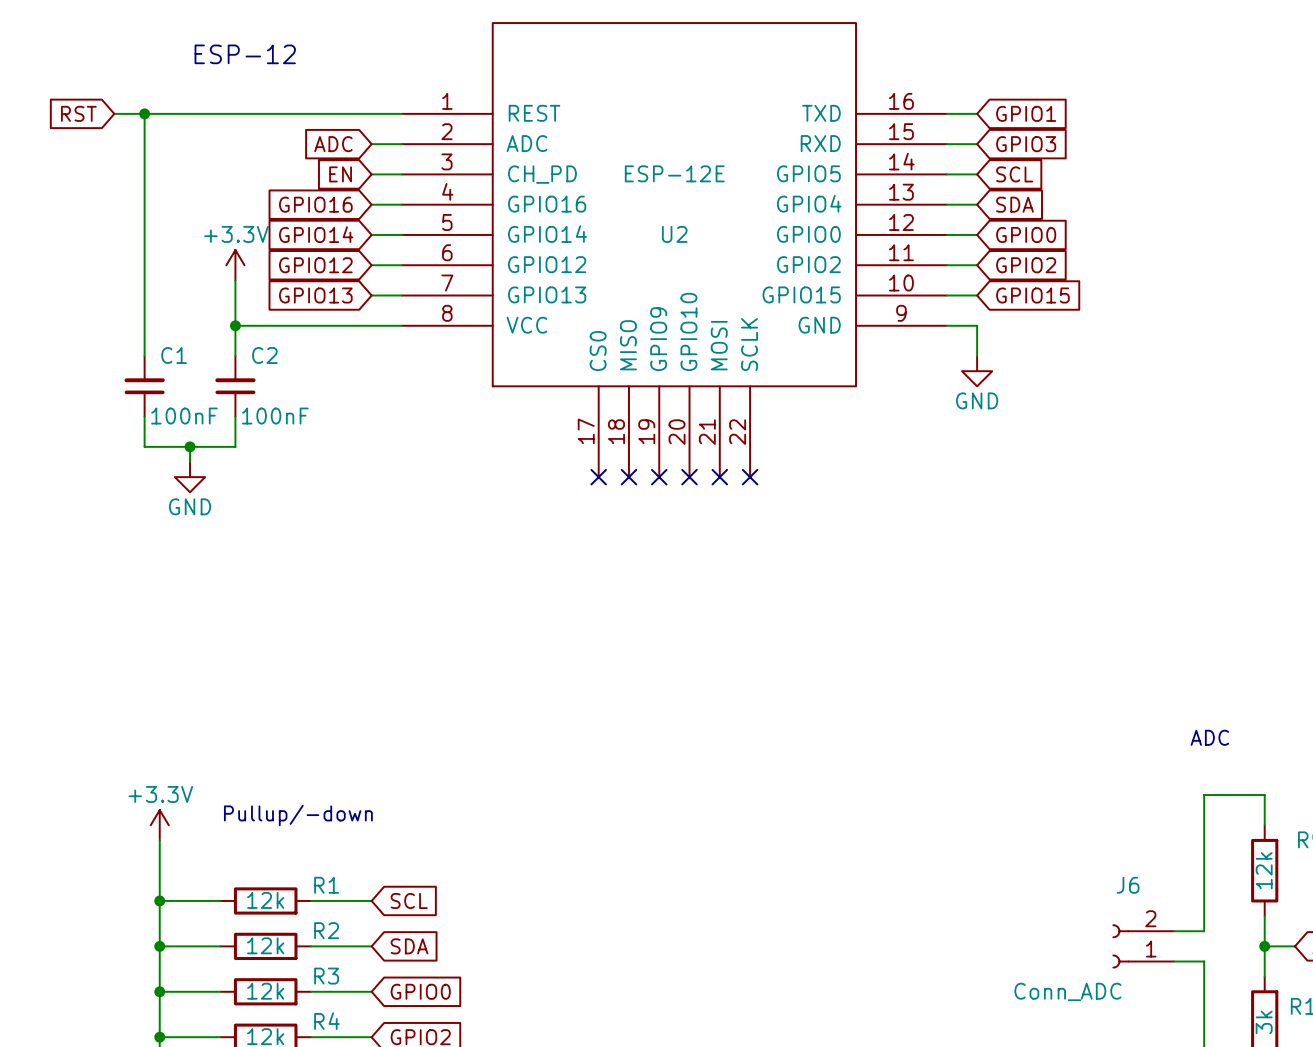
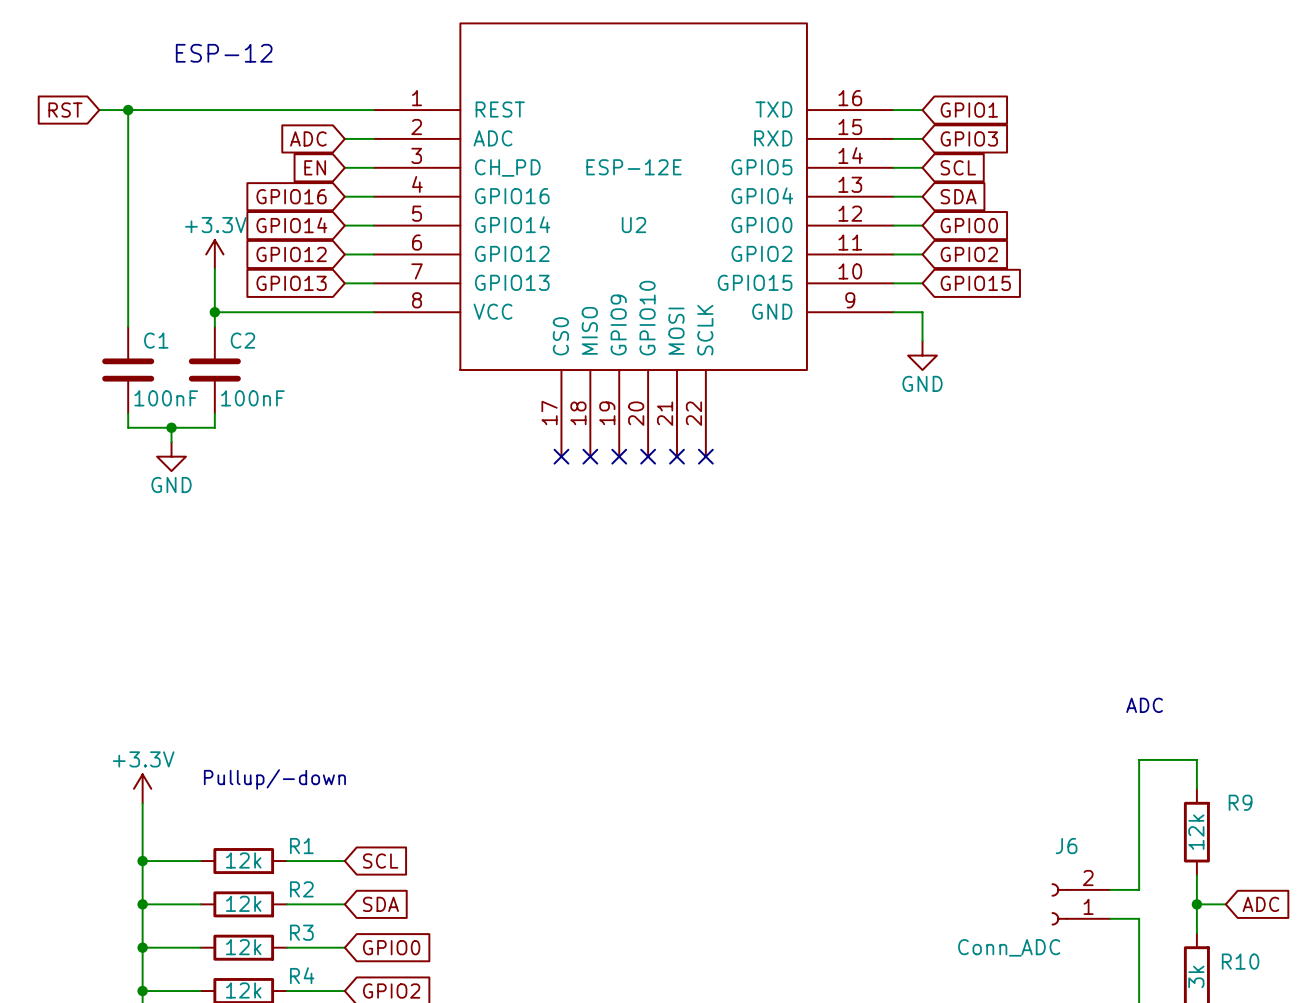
C1 symbol: [124, 356, 165, 417] -> [102, 326, 155, 414]
C2 symbol: [215, 356, 256, 417] -> [188, 326, 241, 414]

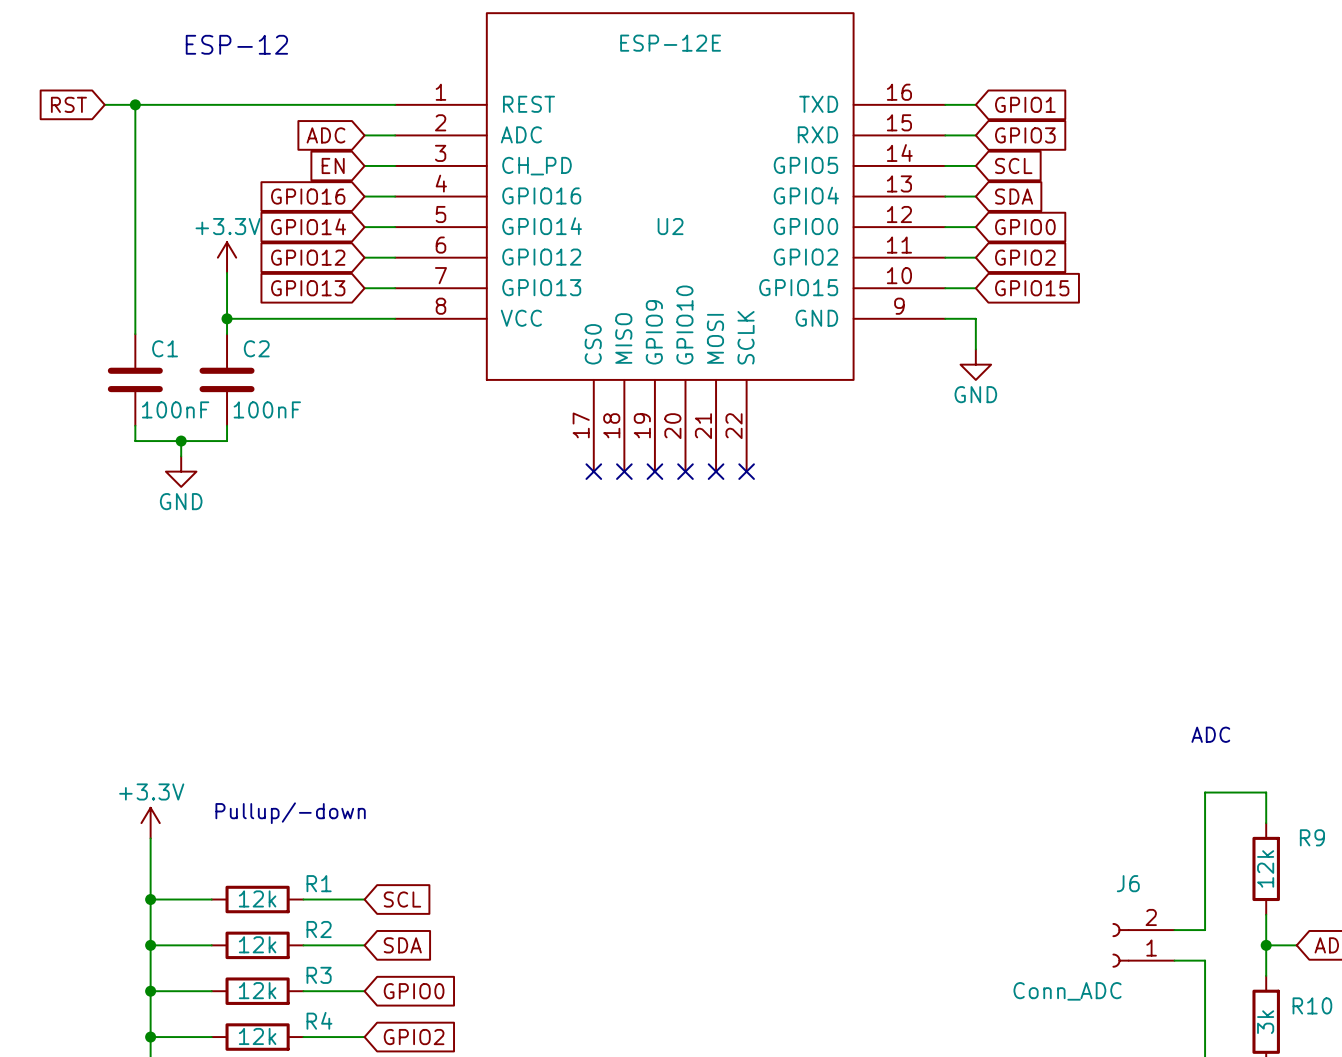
U2 value position: ESP-12E (634, 167) -> ESP-12E (670, 43)

